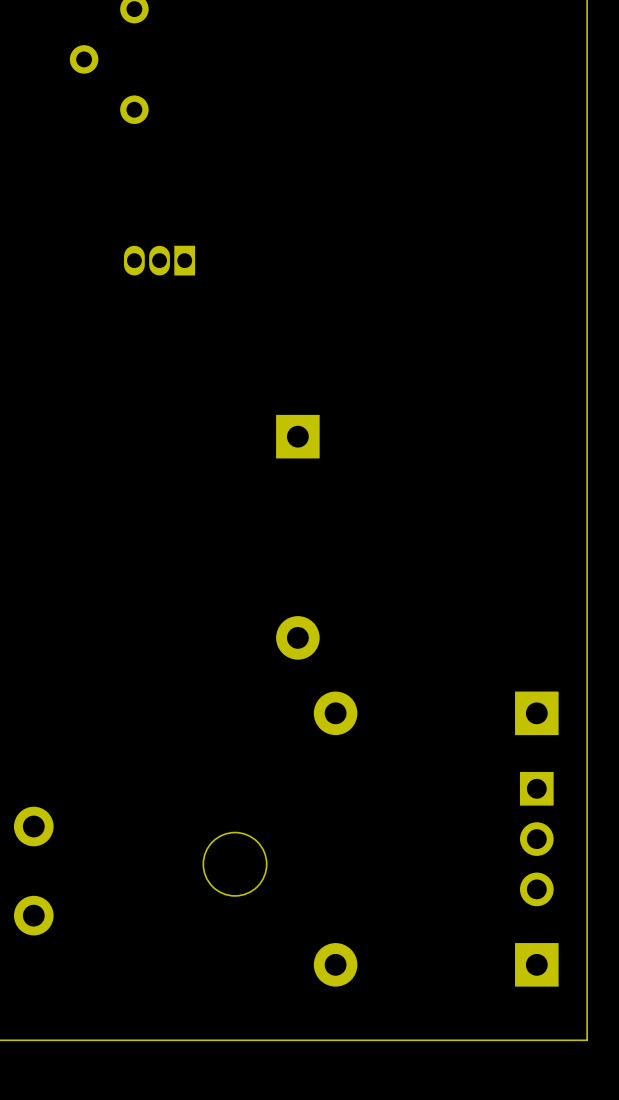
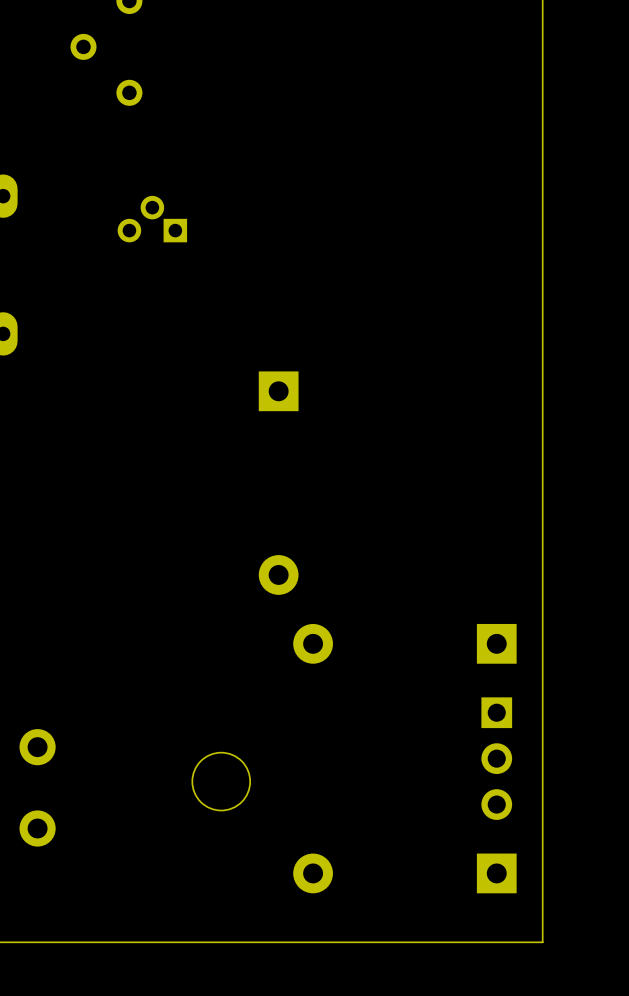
part footprint: [124, 245, 196, 276] -> [117, 195, 188, 243]

